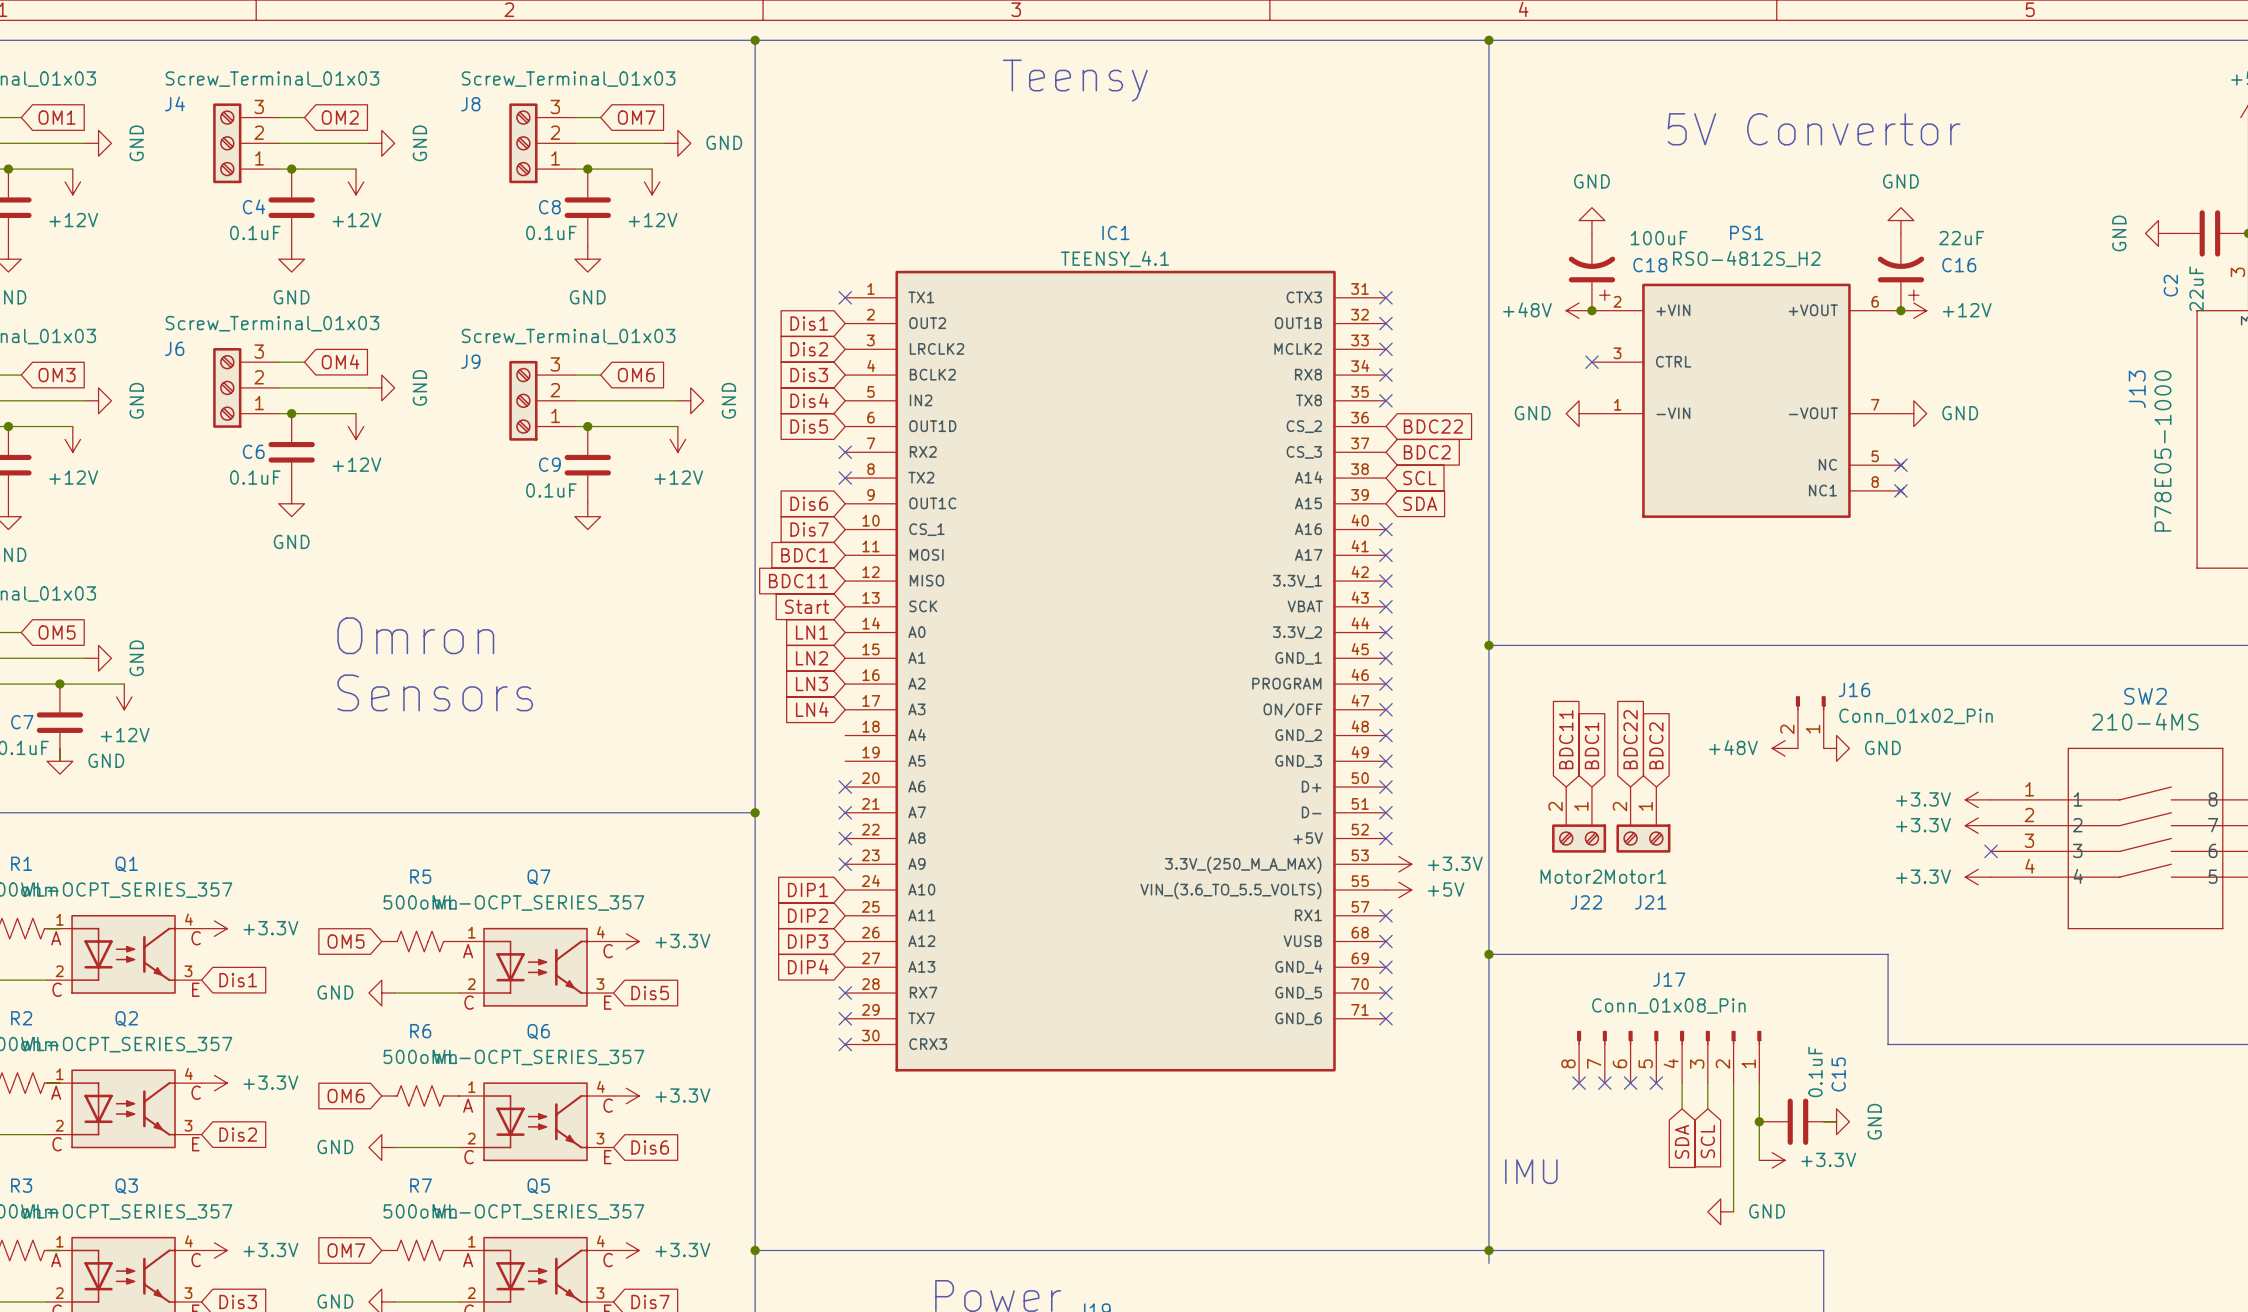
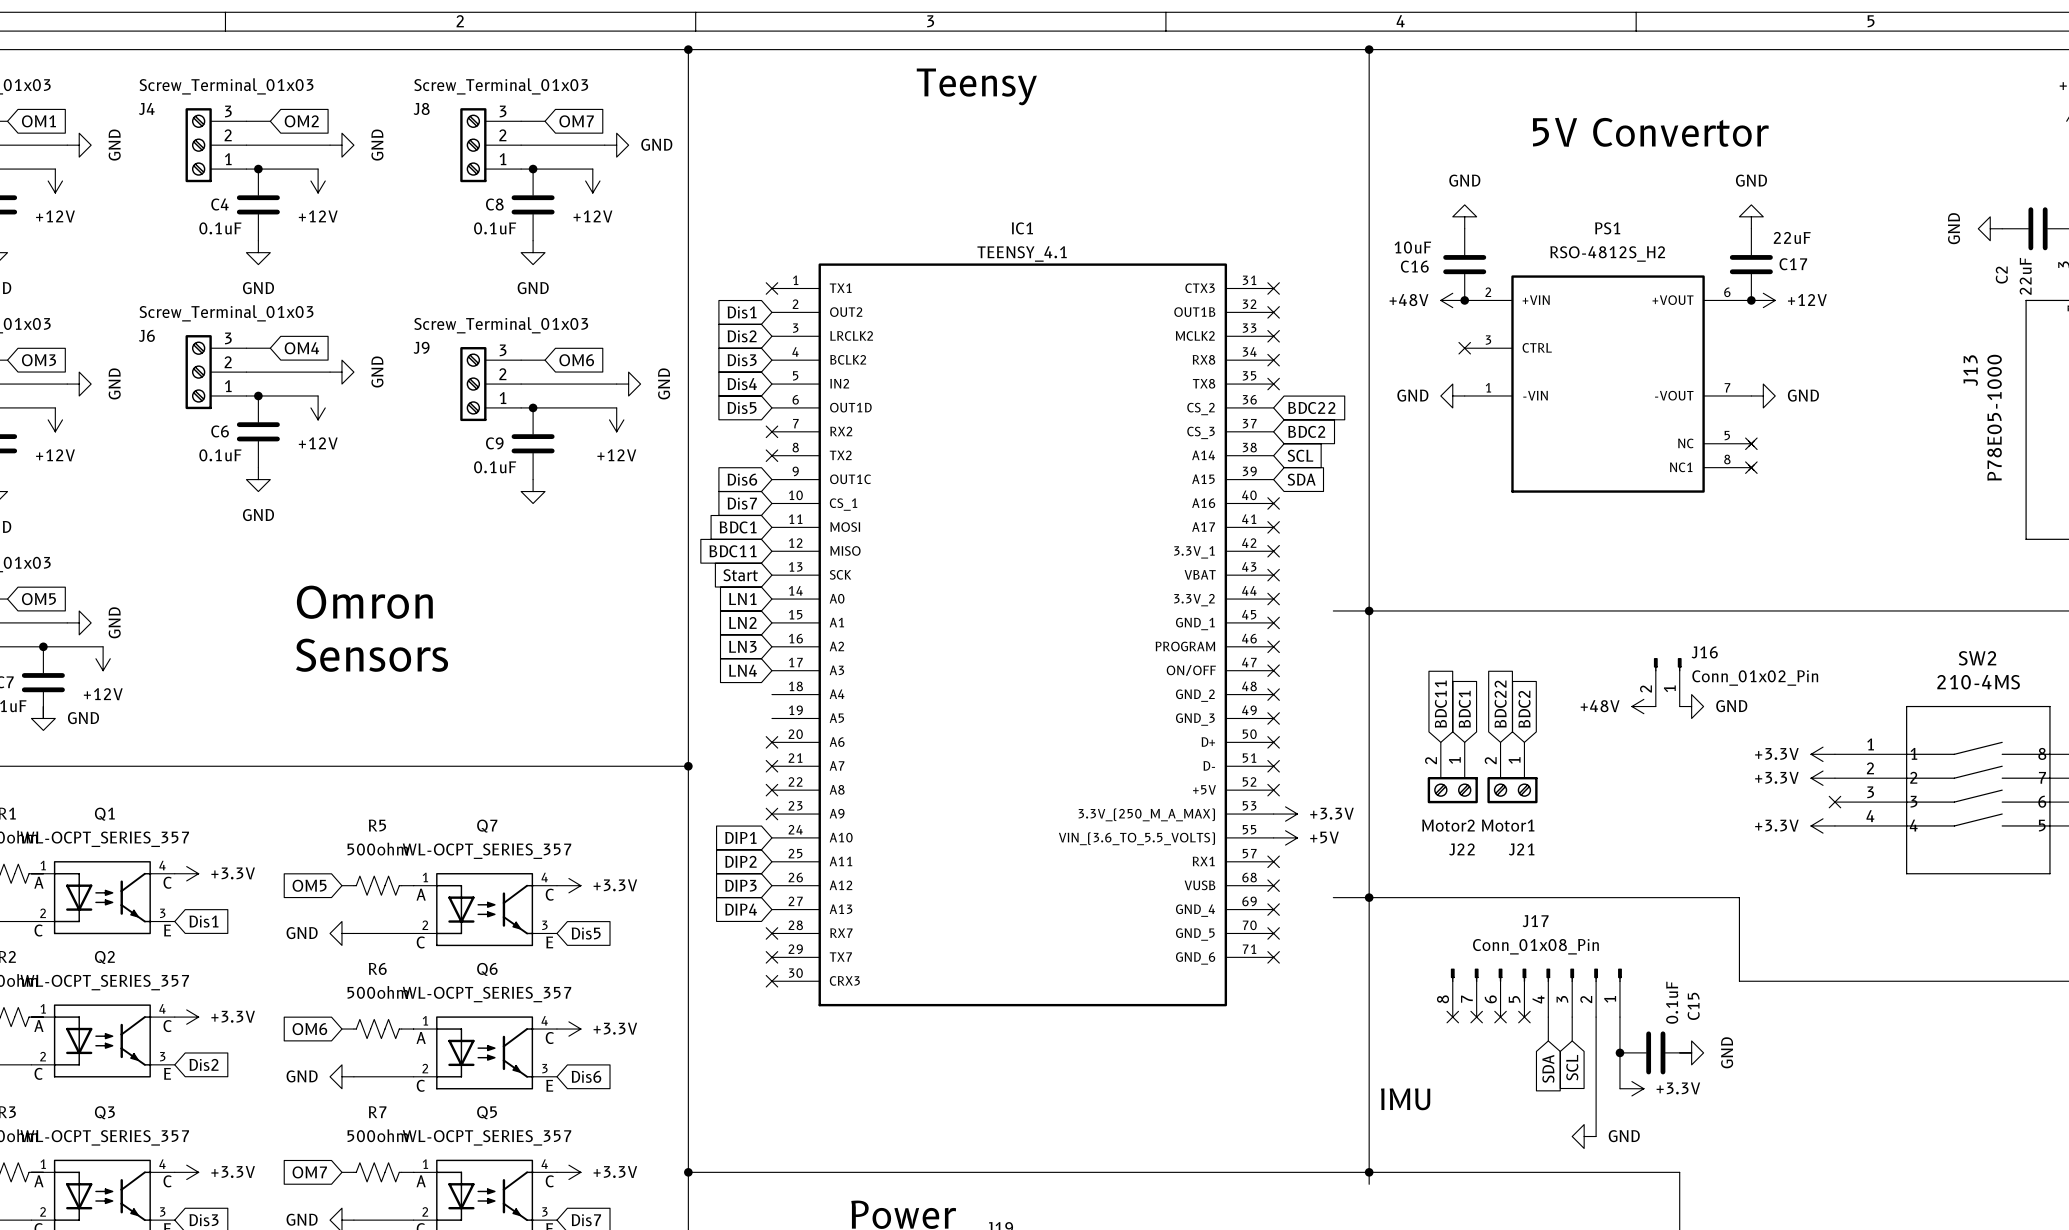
C16 symbol: [1877, 233, 1925, 311] -> [1443, 228, 1487, 301]
C16 value: 22uF (1961, 238) -> 10uF (1412, 247)
C16 name position: C16 (1959, 265) -> C16 (1414, 266)
C18: 100uF (1591, 272) -> none
C17: none -> 22uF (1751, 264)
bus: none -> (1333, 610) (1369, 610)
bus: none -> (1333, 897) (1369, 897)

